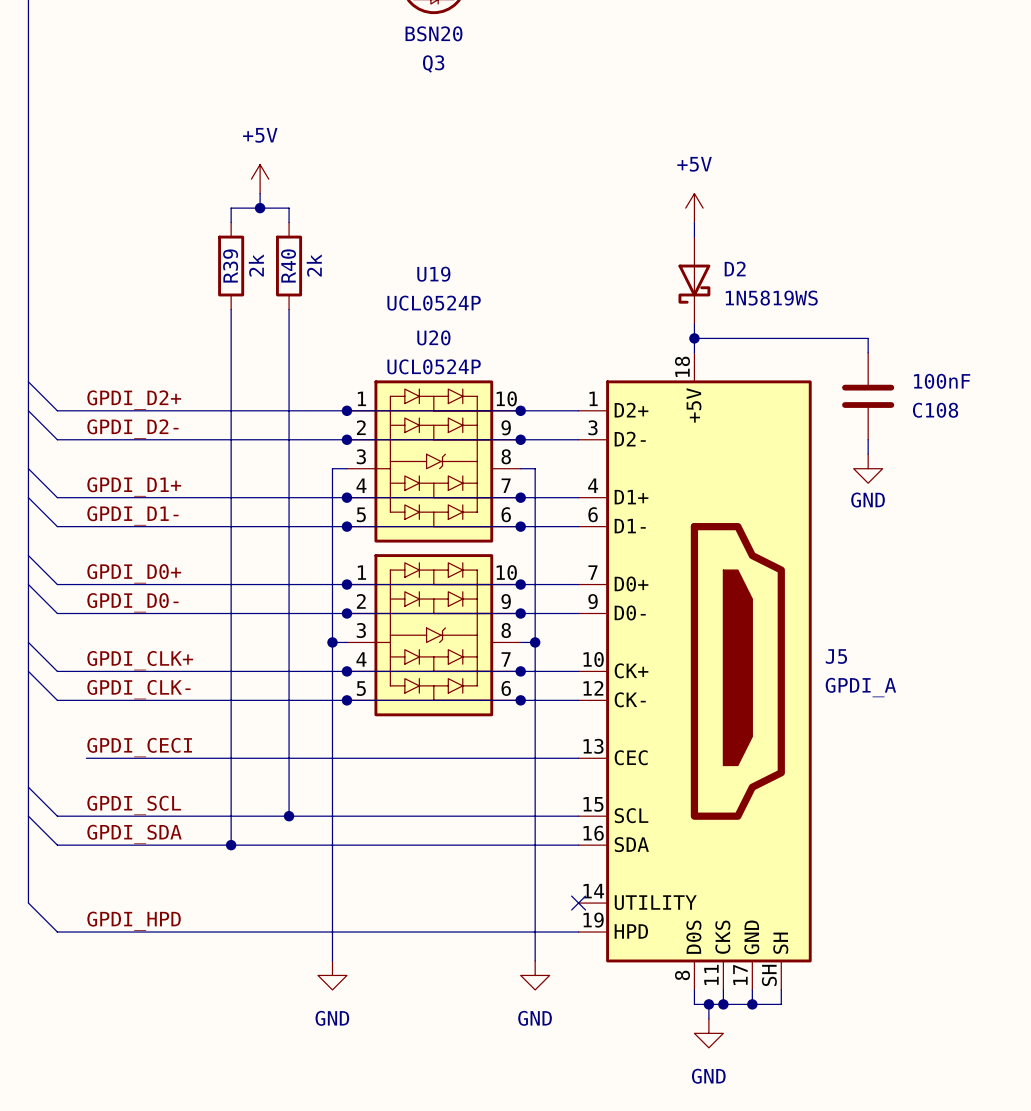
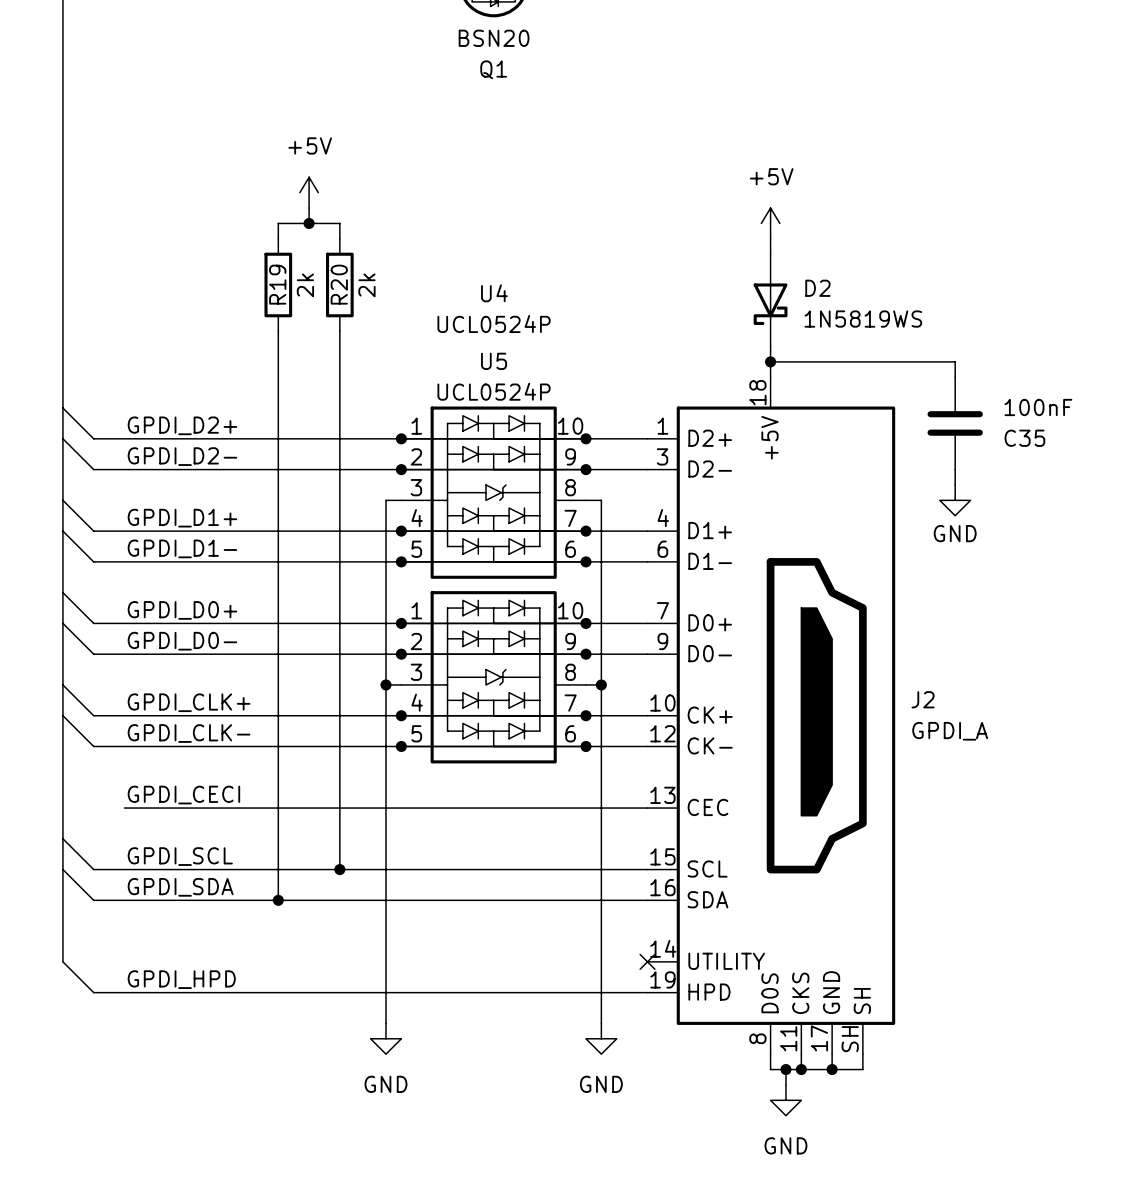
Q3 name: Q3 (433, 63) -> Q1 (493, 69)
R40 name: R40 (288, 265) -> R20 (339, 284)
R39 name: R39 (230, 266) -> R19 (277, 284)
U19 name: U19 (433, 274) -> U4 (494, 293)
U20 name: U20 (433, 337) -> U5 (494, 361)
C108 name: C108 (935, 410) -> C35 (1024, 438)
J5 name: J5 (836, 656) -> J2 (923, 699)

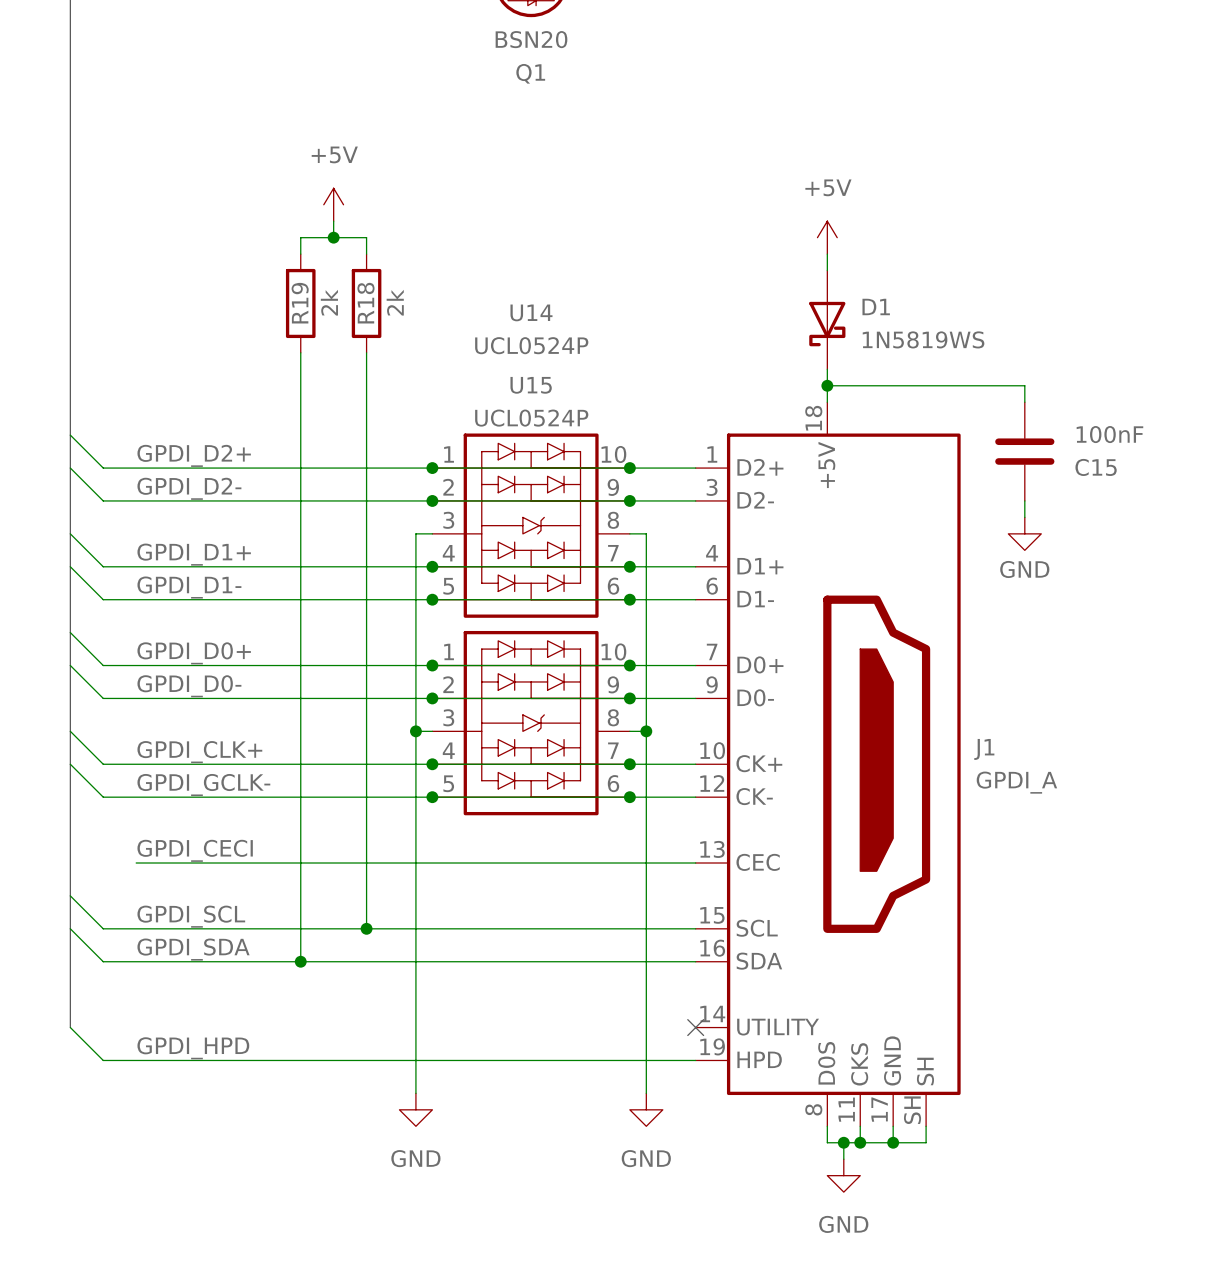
R20 name: R20 (339, 284) -> R18 (365, 303)
D2 name: D2 (817, 288) -> D1 (876, 306)
U4 name: U4 (494, 293) -> U14 (531, 312)
U5 name: U5 (494, 361) -> U15 (531, 385)
C35 name: C35 (1024, 438) -> C15 (1096, 467)
J2 name: J2 (923, 699) -> J1 (984, 749)
label: GPDI_CLK- (189, 733) -> GPDI_GCLK- (203, 785)

